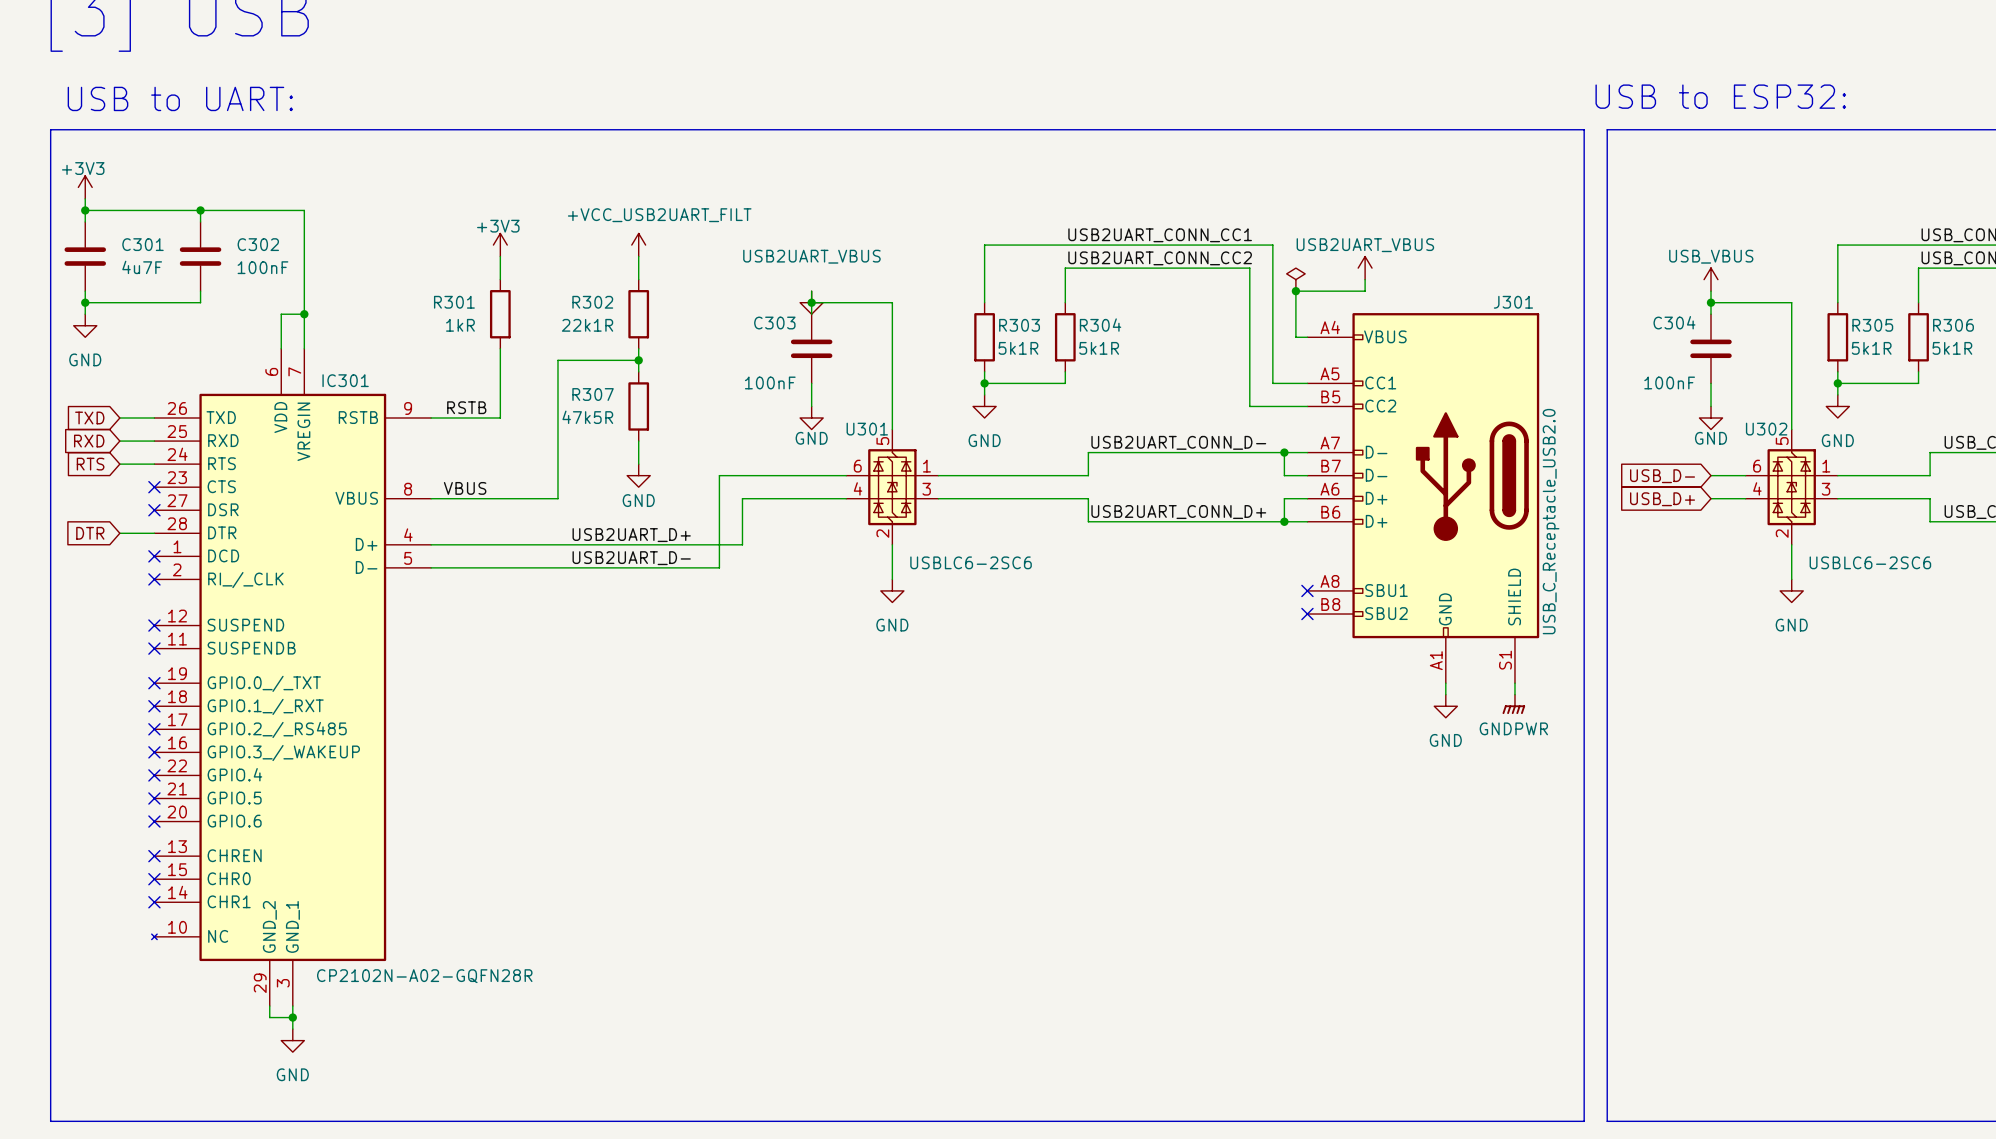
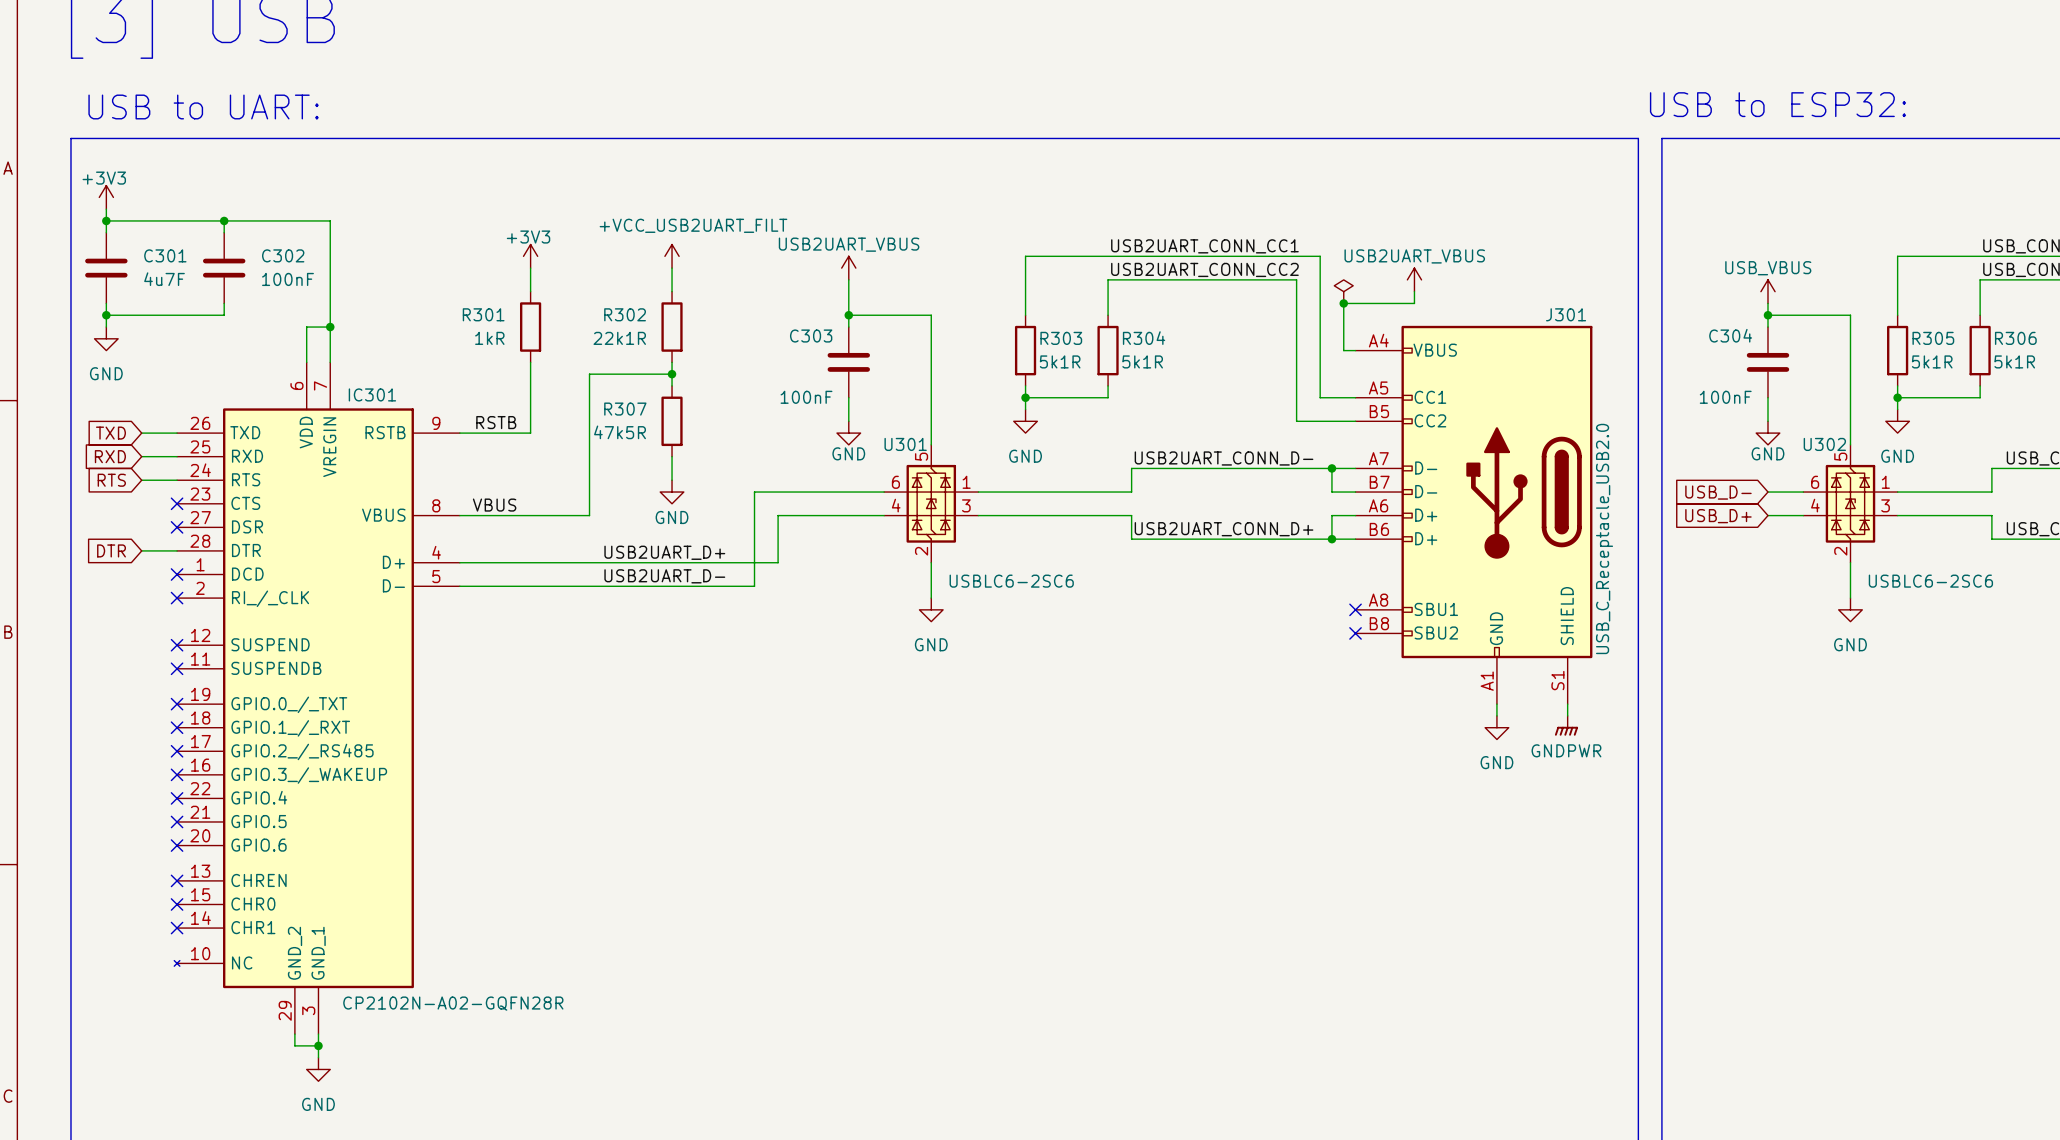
power symbol: none -> USB2UART_VBUS (848, 268)
wire: none -> (848, 279) (848, 303)
power symbol: USB2UART_VBUS (811, 302) -> none

